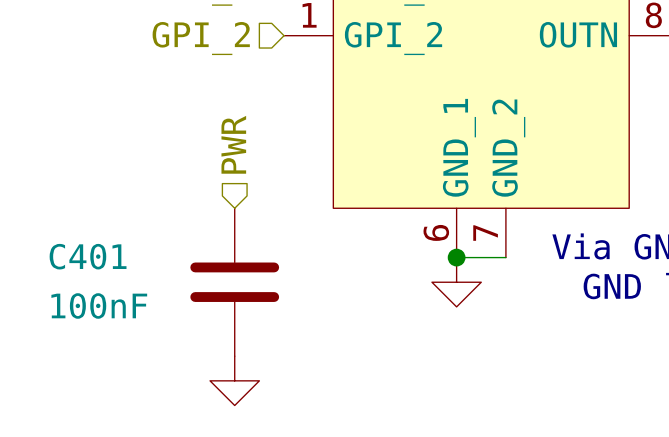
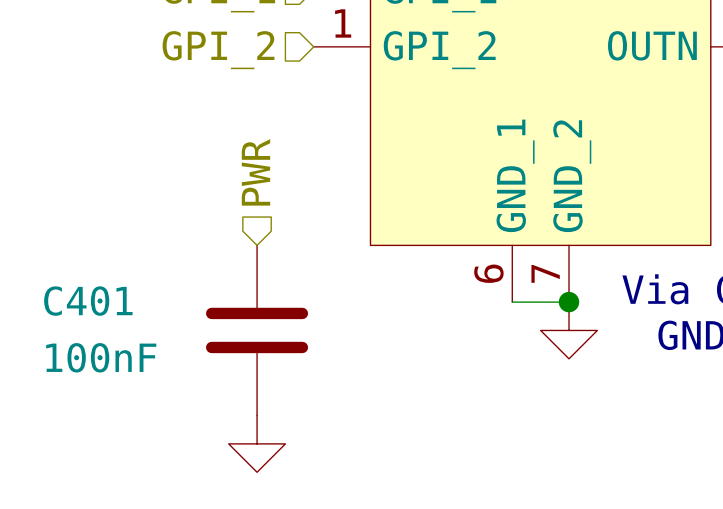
junction position: (456, 257) -> (569, 302)
power symbol position: (456, 282) -> (569, 330)

